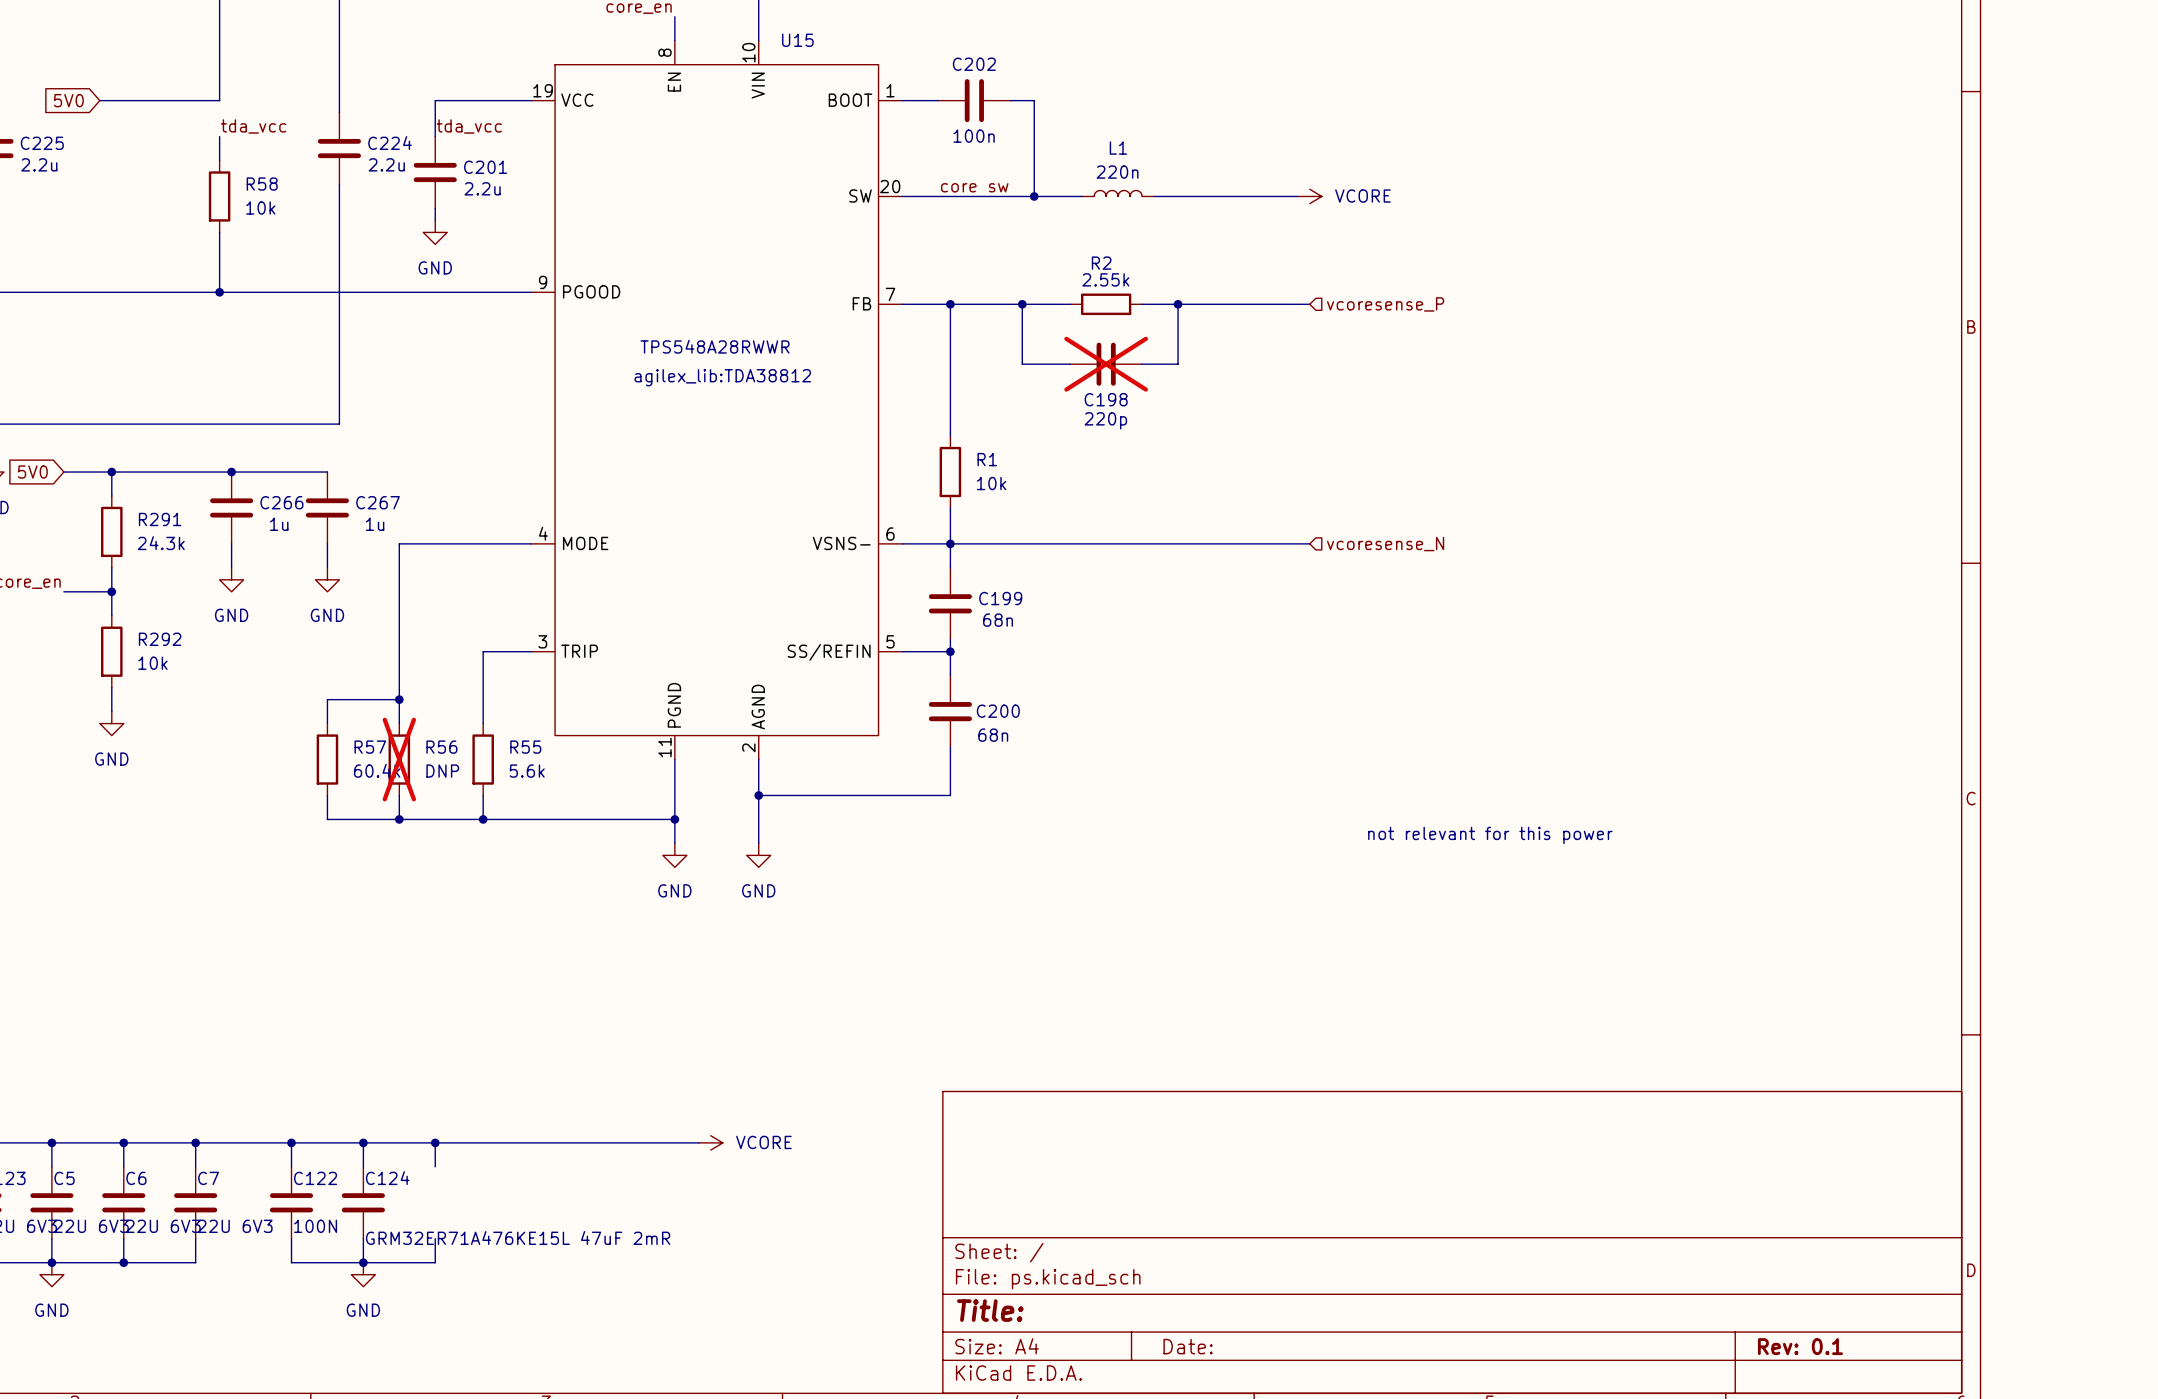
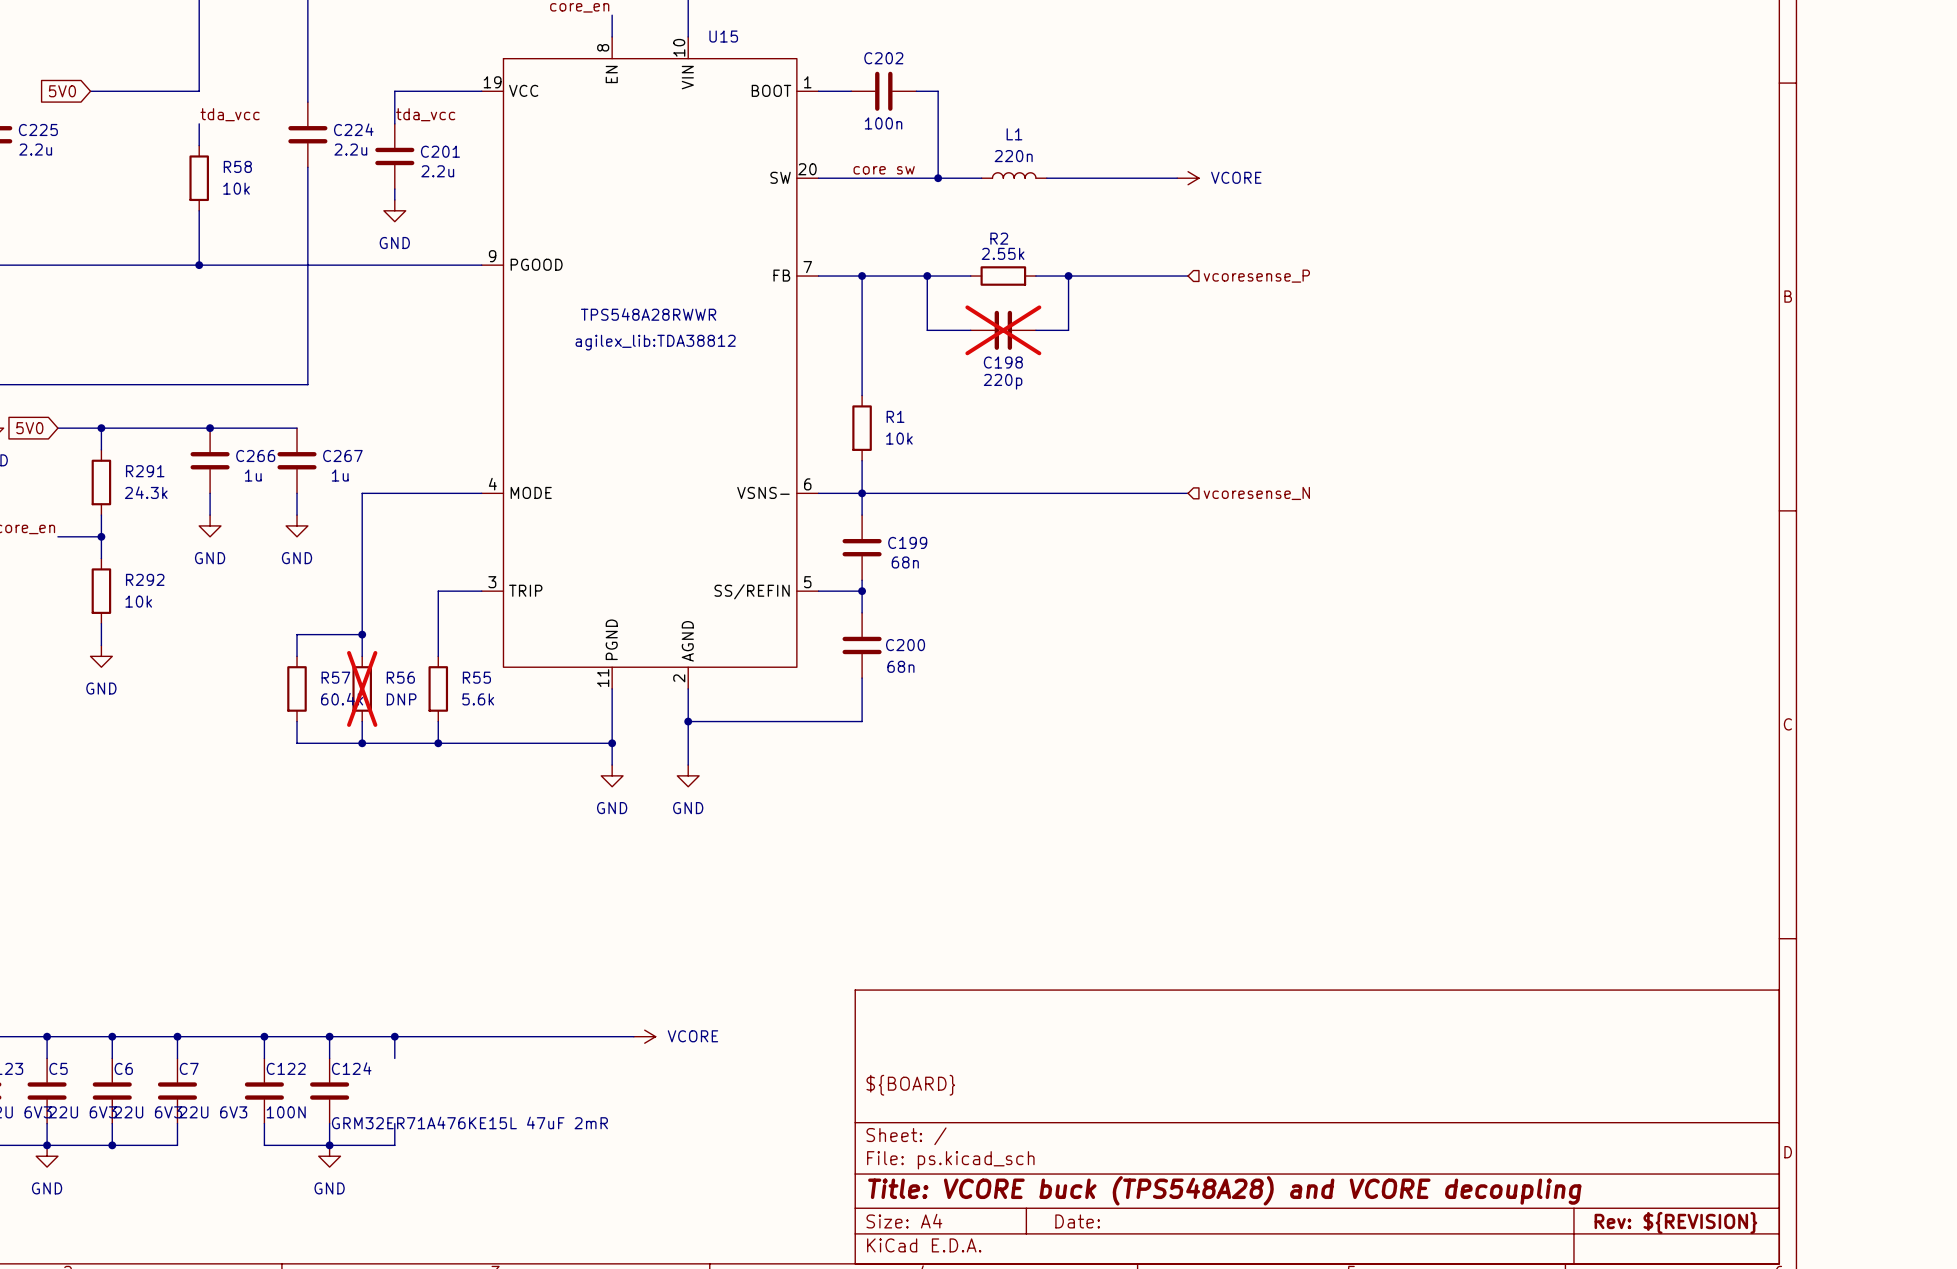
text: not relevant for this power (1490, 835) -> none
title block: none -> ${BOARD} (910, 1085)
title block: Title: (990, 1310) -> Title: VCORE buck (TPS548A28) and VCORE decoupling (1224, 1190)
title block: Rev: 0.1 (1800, 1346) -> Rev: ${REVISION} (1675, 1222)

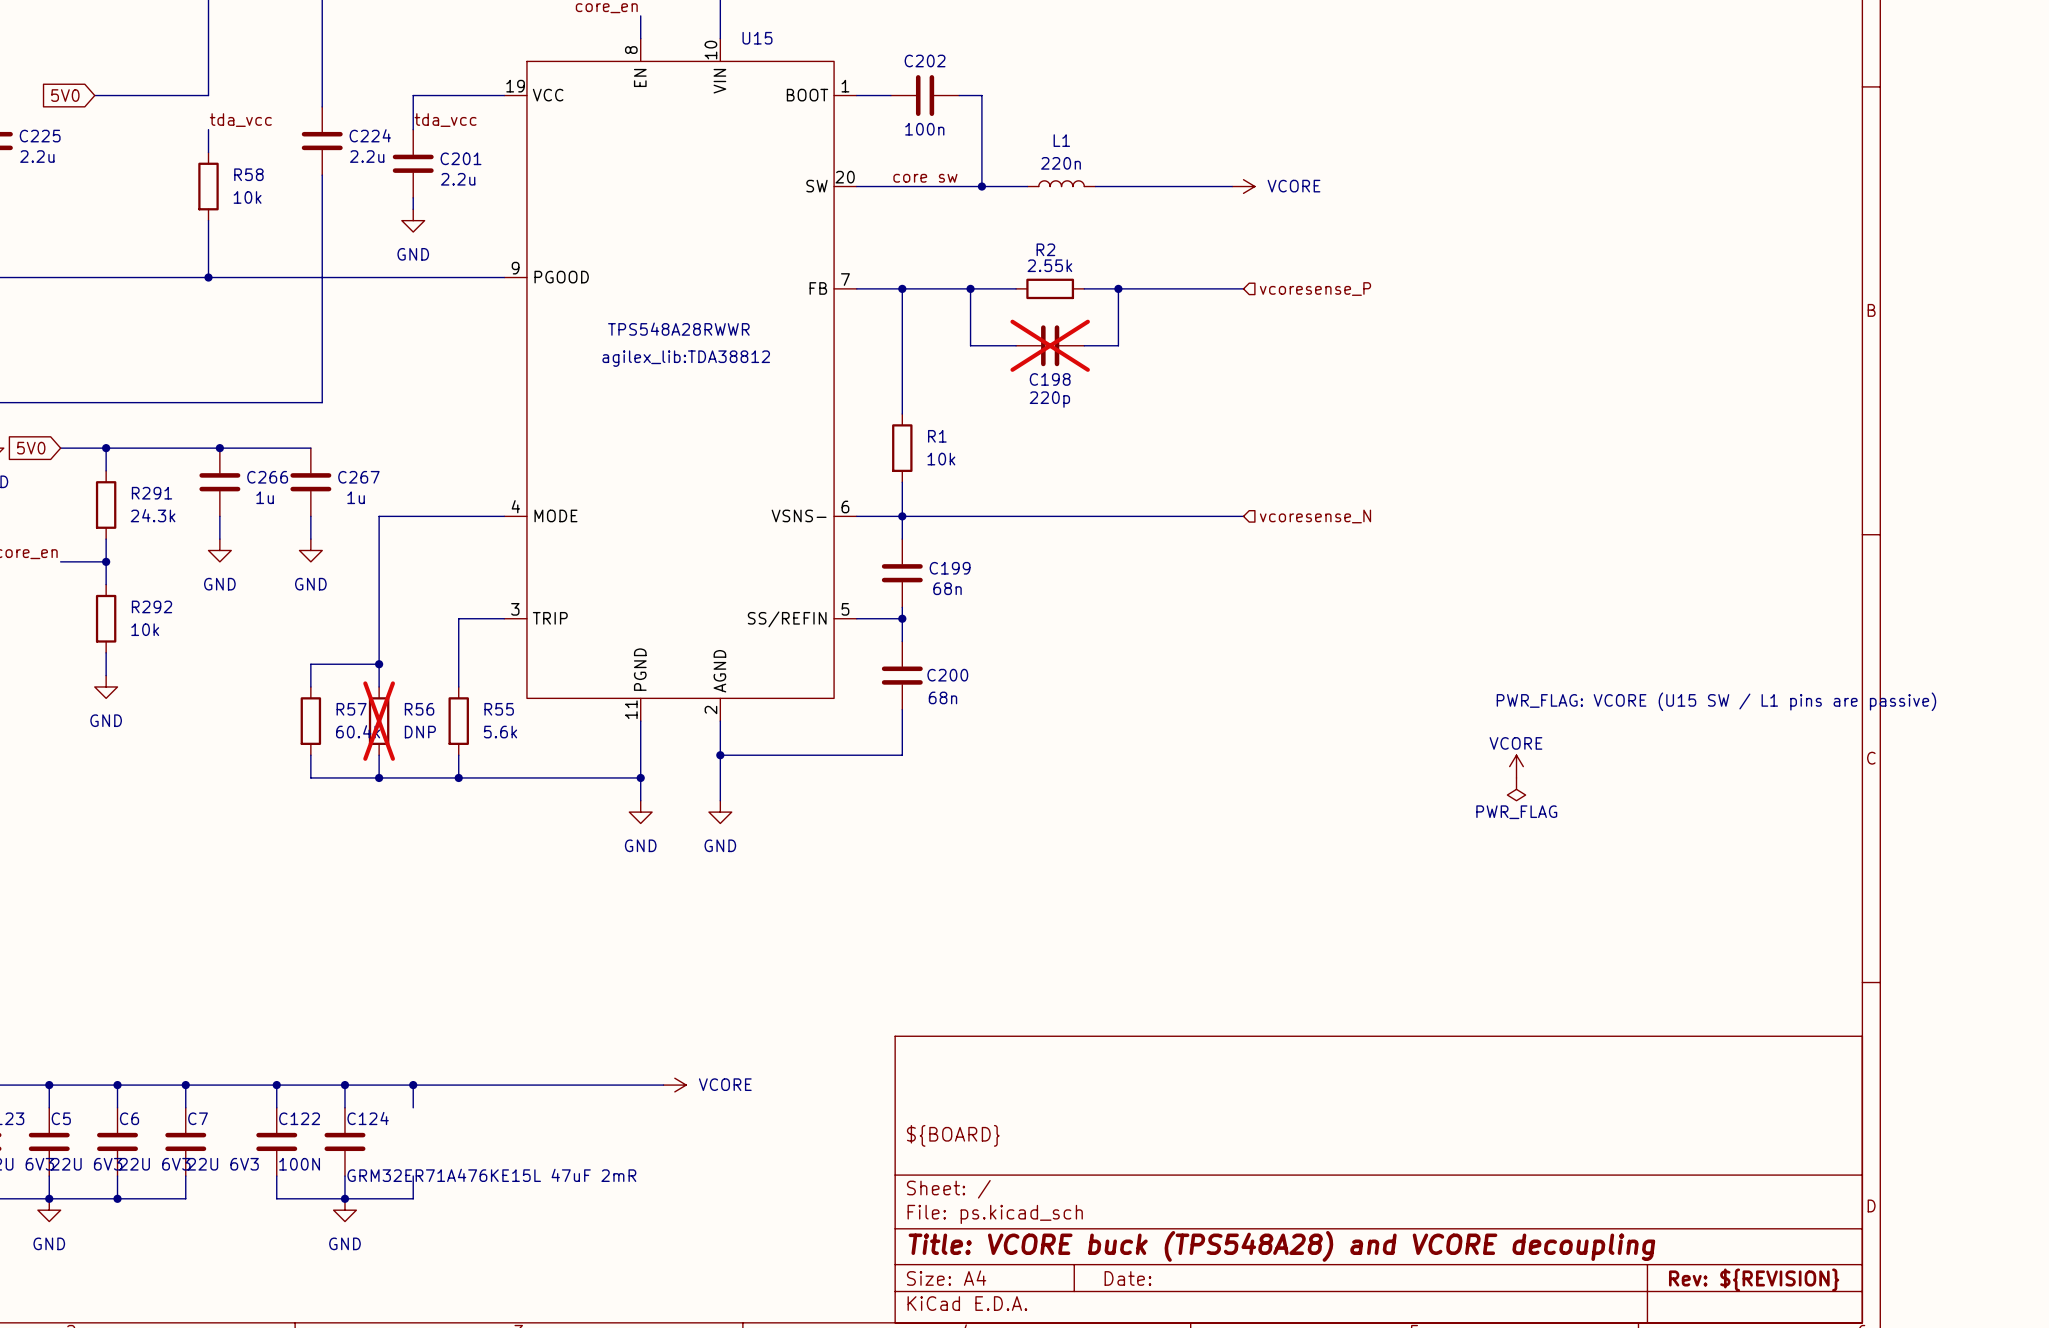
text: none -> PWR_FLAG: VCORE (U15 SW / L1 pins are passive) (1716, 701)
power symbol: none -> VCORE (1516, 766)
power symbol: none -> PWR_FLAG (1516, 789)

